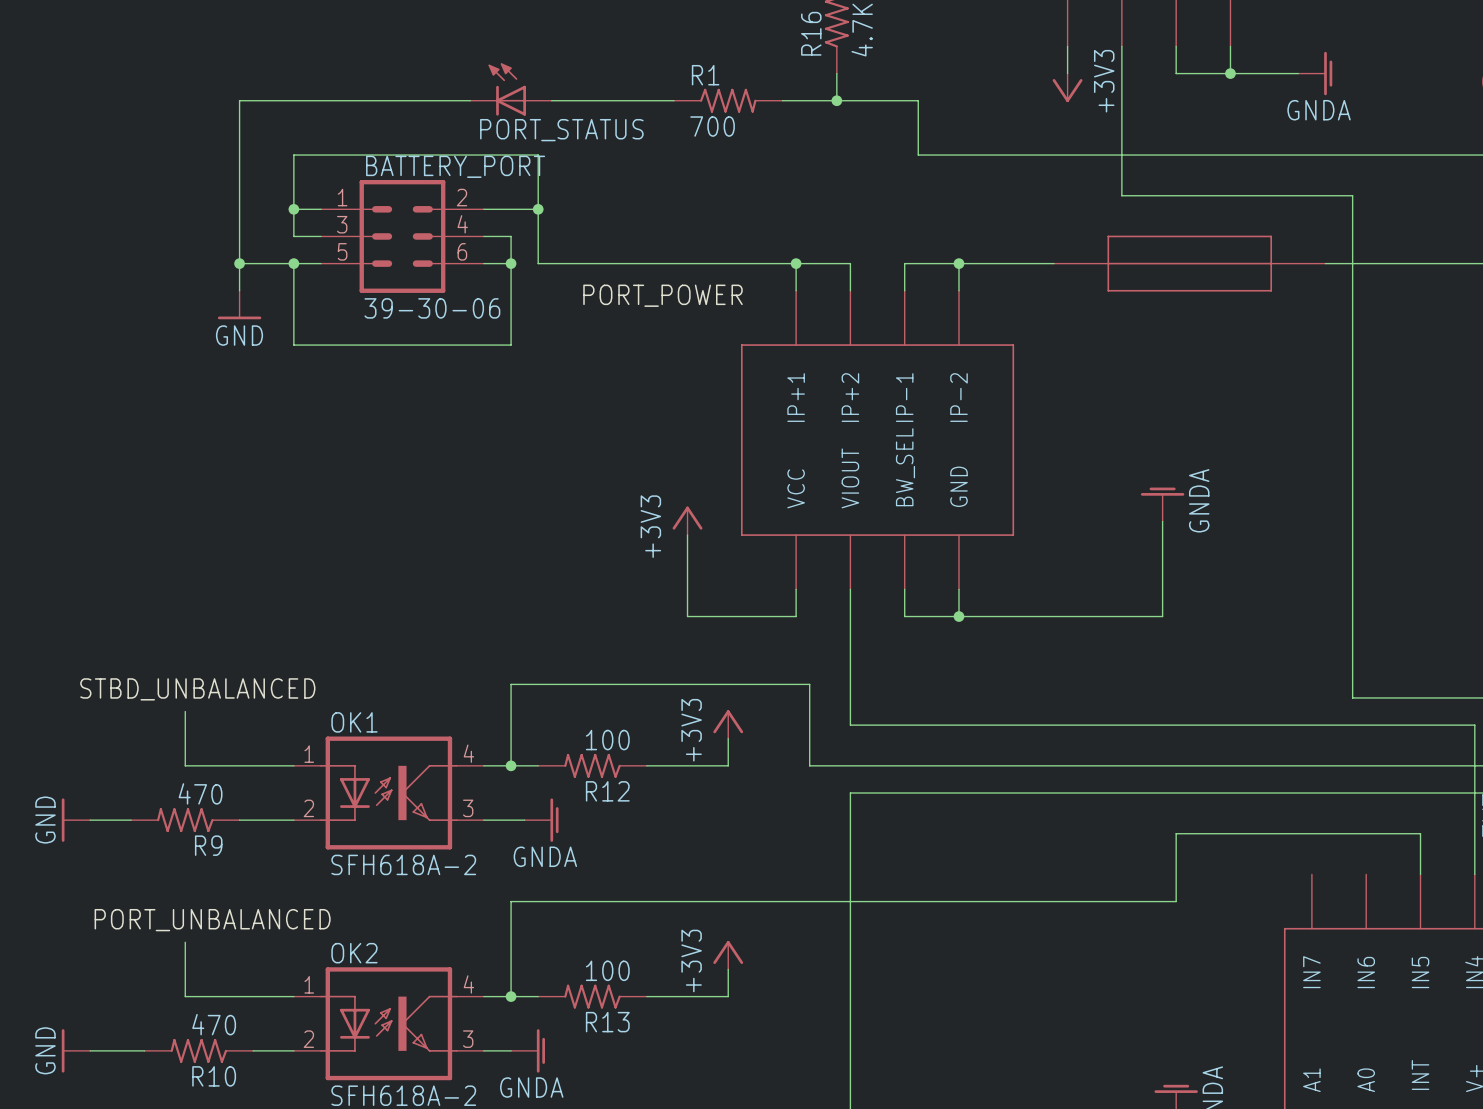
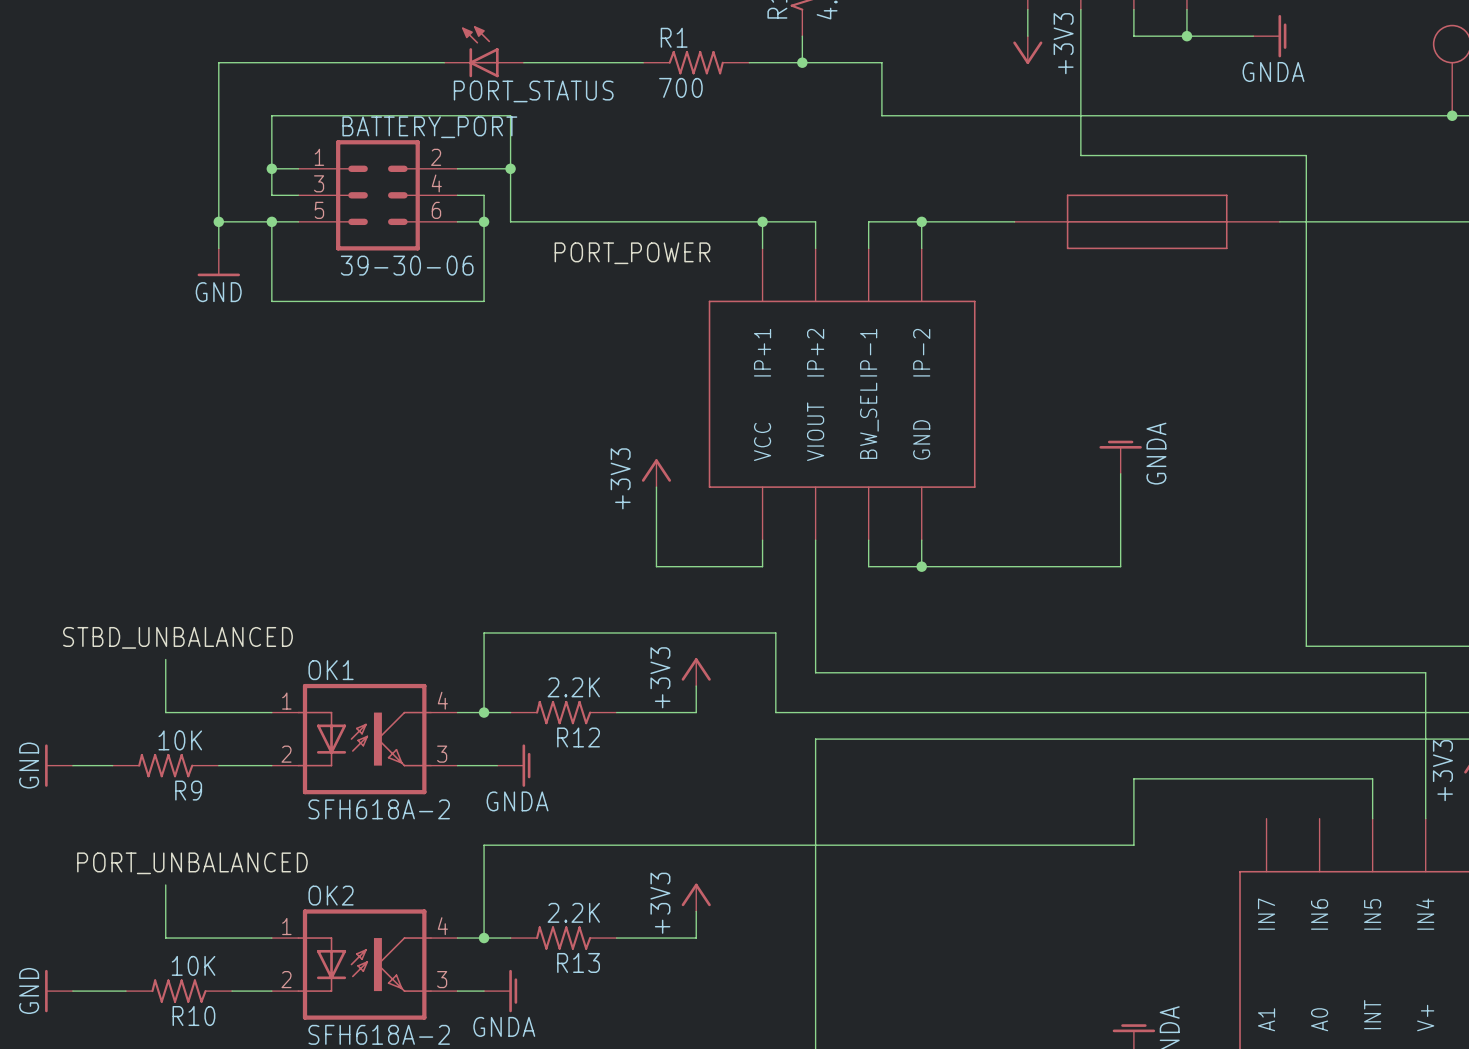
R12 value: 100 (607, 740) -> 2.2K (573, 687)
R9 value: 470 (200, 793) -> 10K (180, 740)
R13 value: 100 (607, 970) -> 2.2K (573, 912)
R10 value: 470 (214, 1024) -> 10K (193, 965)

